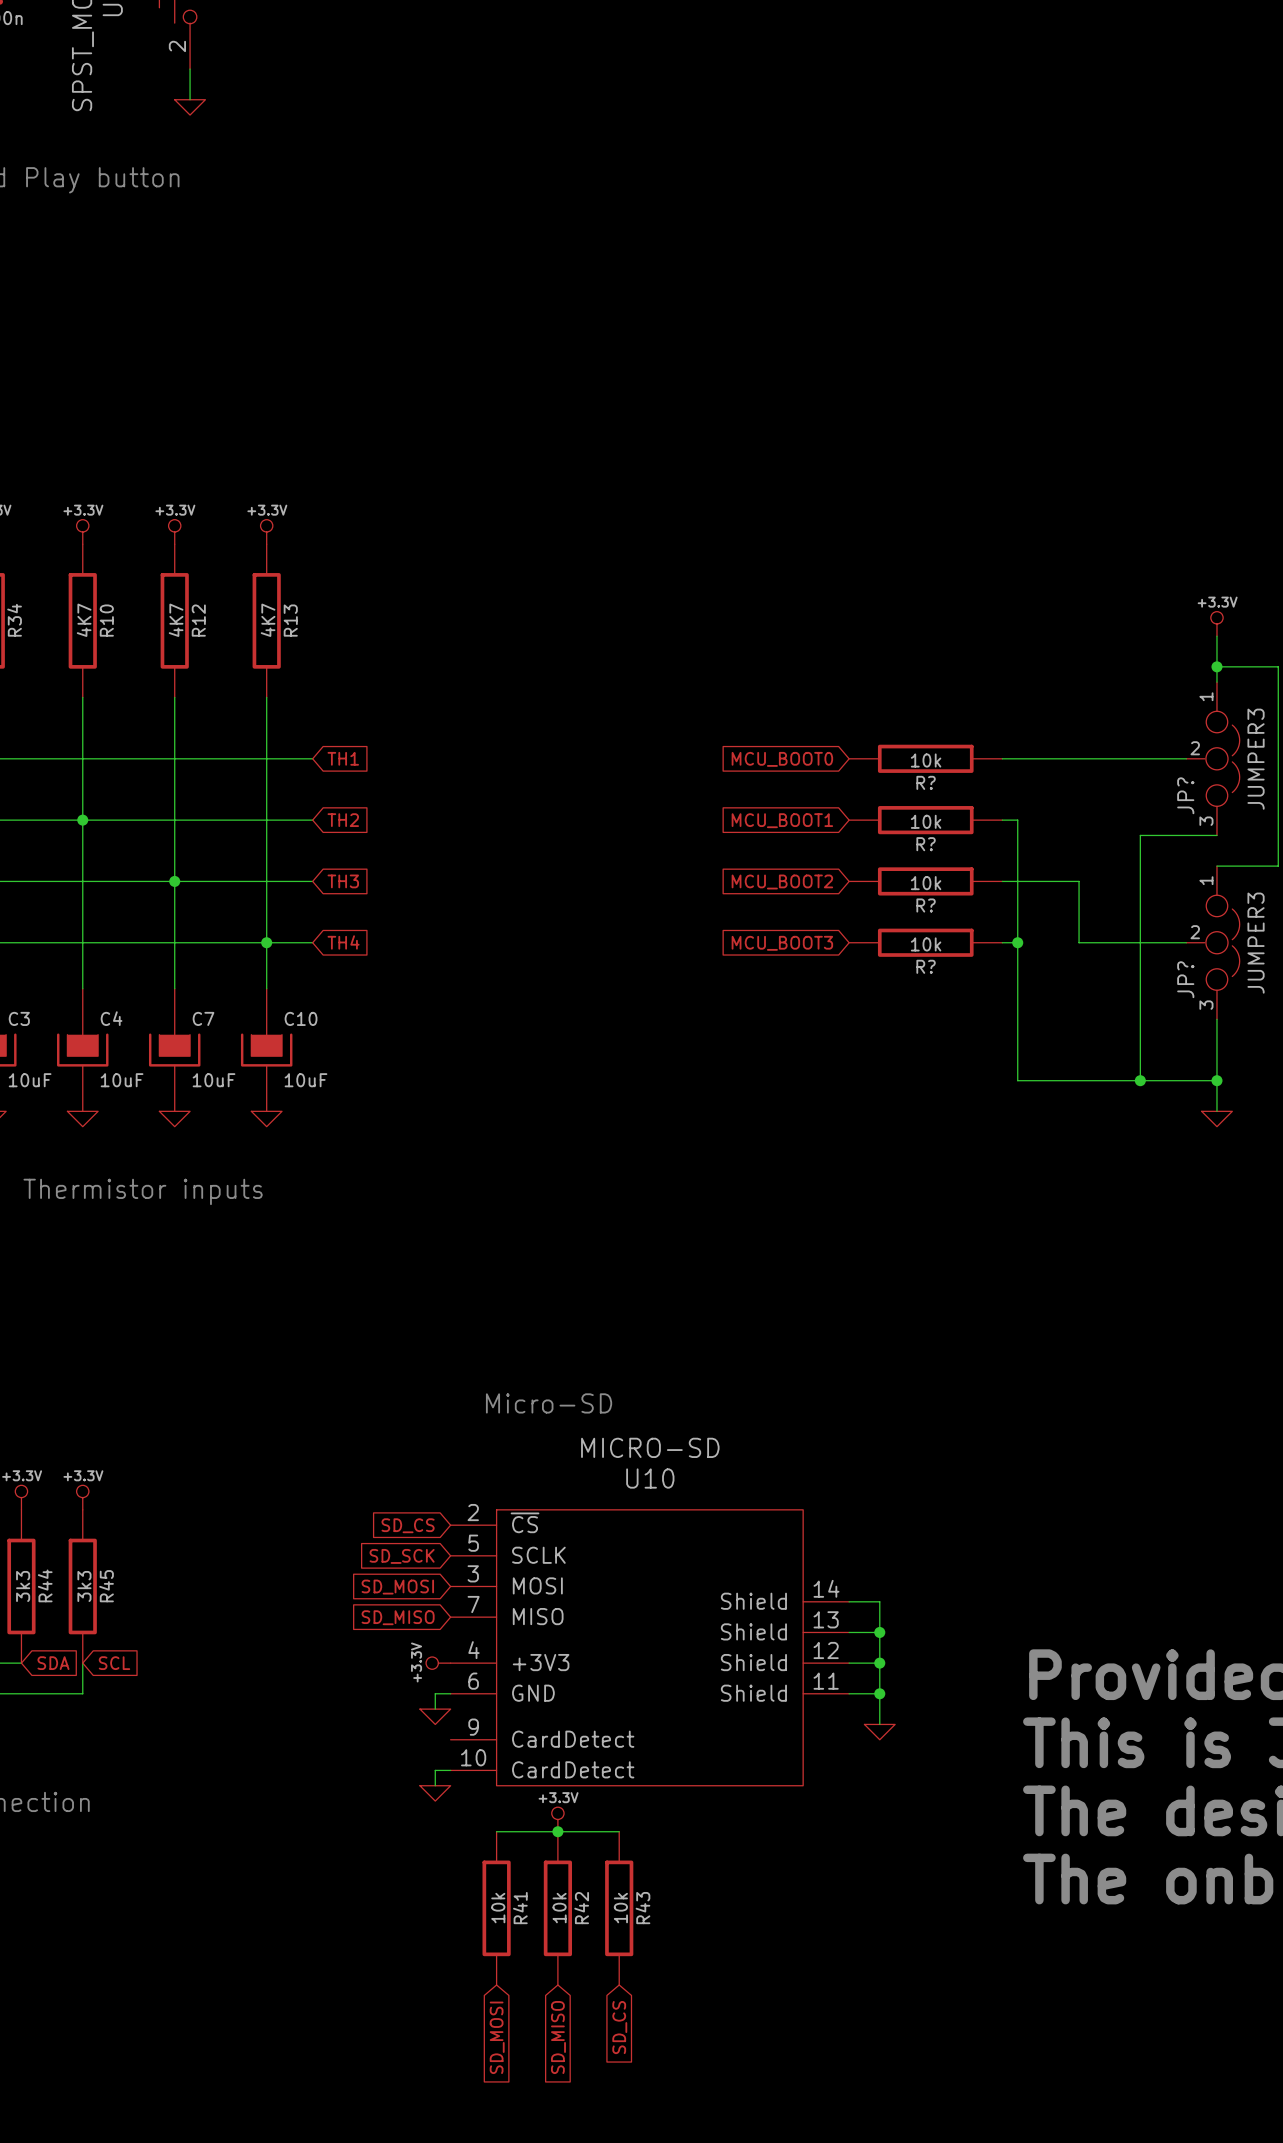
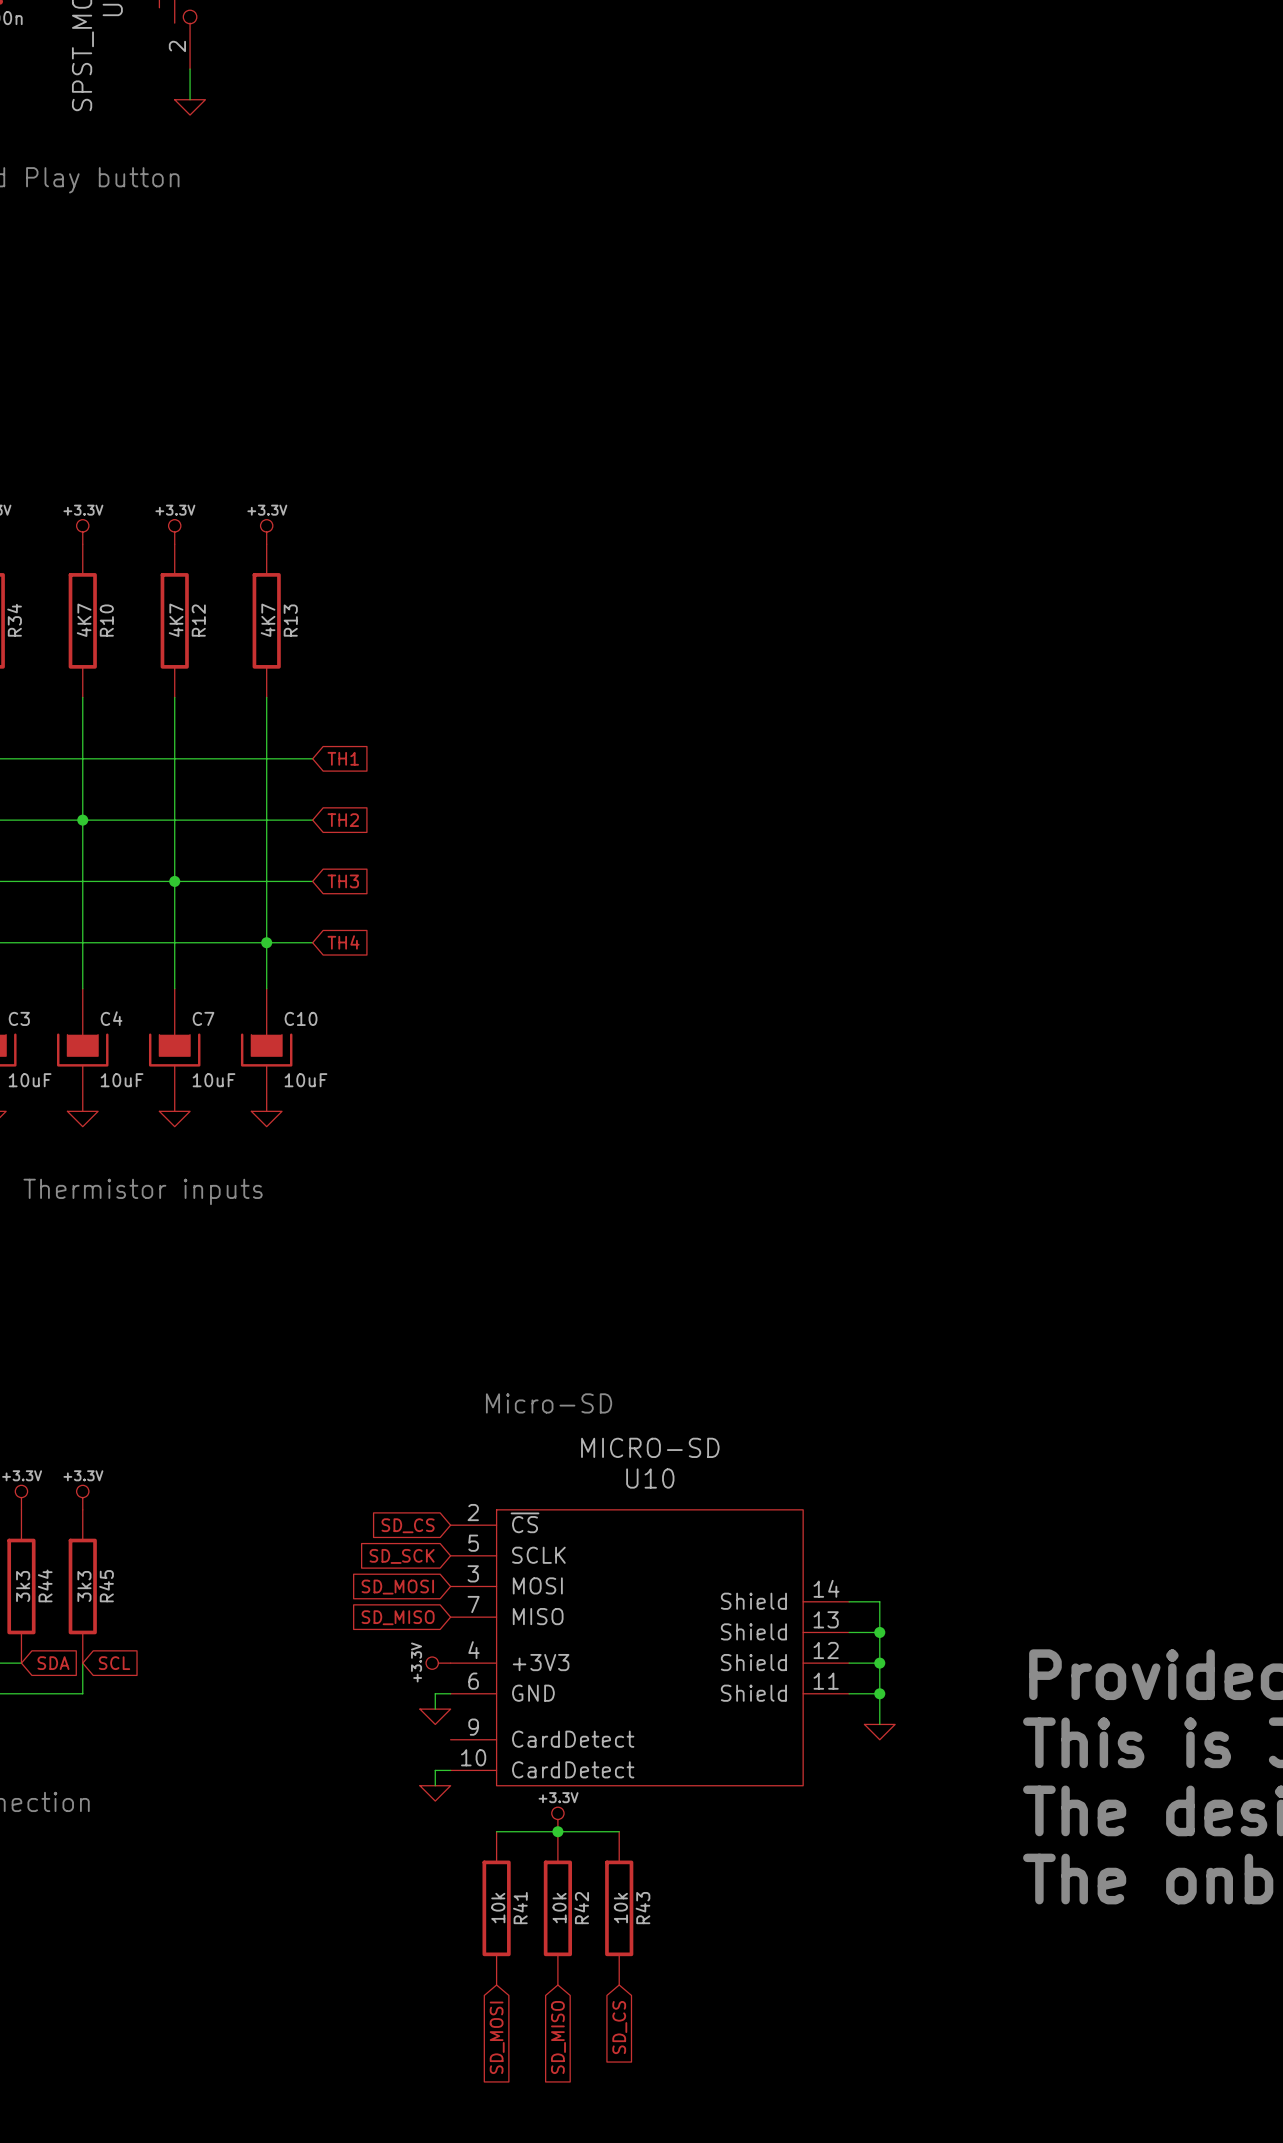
power symbol: +3.3V (1216, 623) -> none
wire: (1216, 636) (1216, 682) -> none
wire: (1216, 666) (1278, 666) (1278, 866) (1216, 866) -> none
junction: (1216, 666) -> none
R?: 10k (925, 758) -> none
wire: (1002, 758) (1186, 758) -> none
JP?: JUMPER3 (1212, 758) -> none
global label: MCU_BOOT0 (782, 759) -> none
global label: MCU_BOOT1 (782, 820) -> none
R?: 10k (925, 820) -> none
wire: (1002, 820) (1017, 820) (1017, 1080) (1216, 1080) -> none
wire: (1216, 835) (1140, 835) (1140, 1080) -> none
R?: 10k (925, 881) -> none
wire: (1002, 881) (1079, 881) (1079, 942) (1186, 942) -> none
global label: MCU_BOOT2 (782, 882) -> none
R?: 10k (925, 942) -> none
wire: (1002, 942) (1017, 942) -> none
junction: (1017, 942) -> none
JP?: JUMPER3 (1212, 942) -> none
global label: MCU_BOOT3 (782, 943) -> none
wire: (1216, 1019) (1216, 1111) -> none
junction: (1140, 1080) -> none
junction: (1216, 1080) -> none
power symbol: (1216, 1119) -> none

